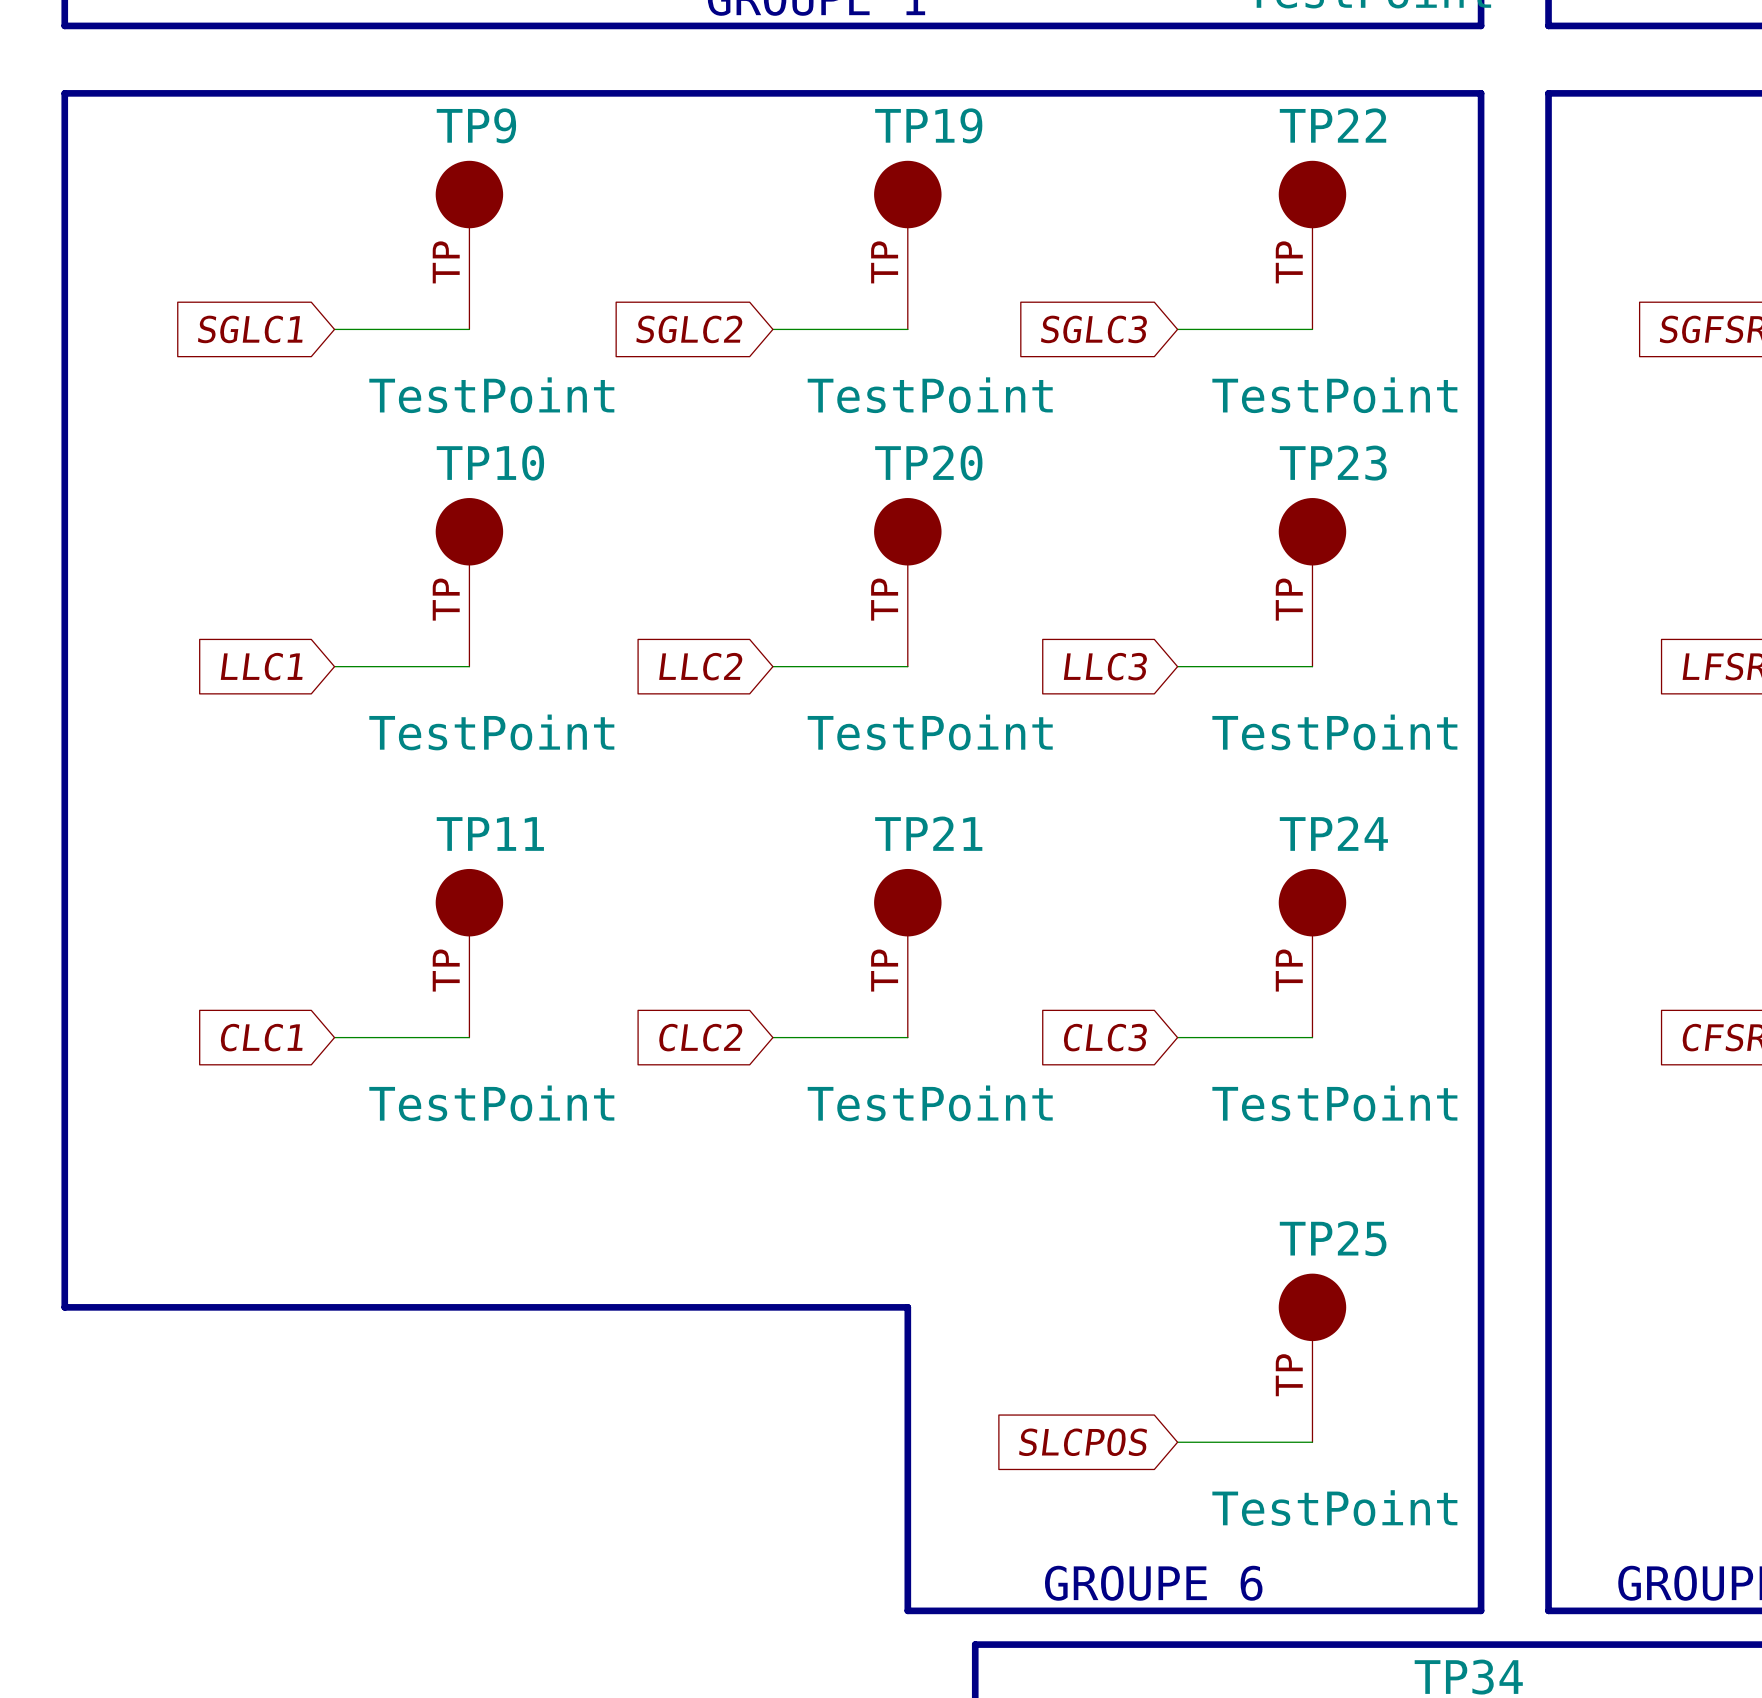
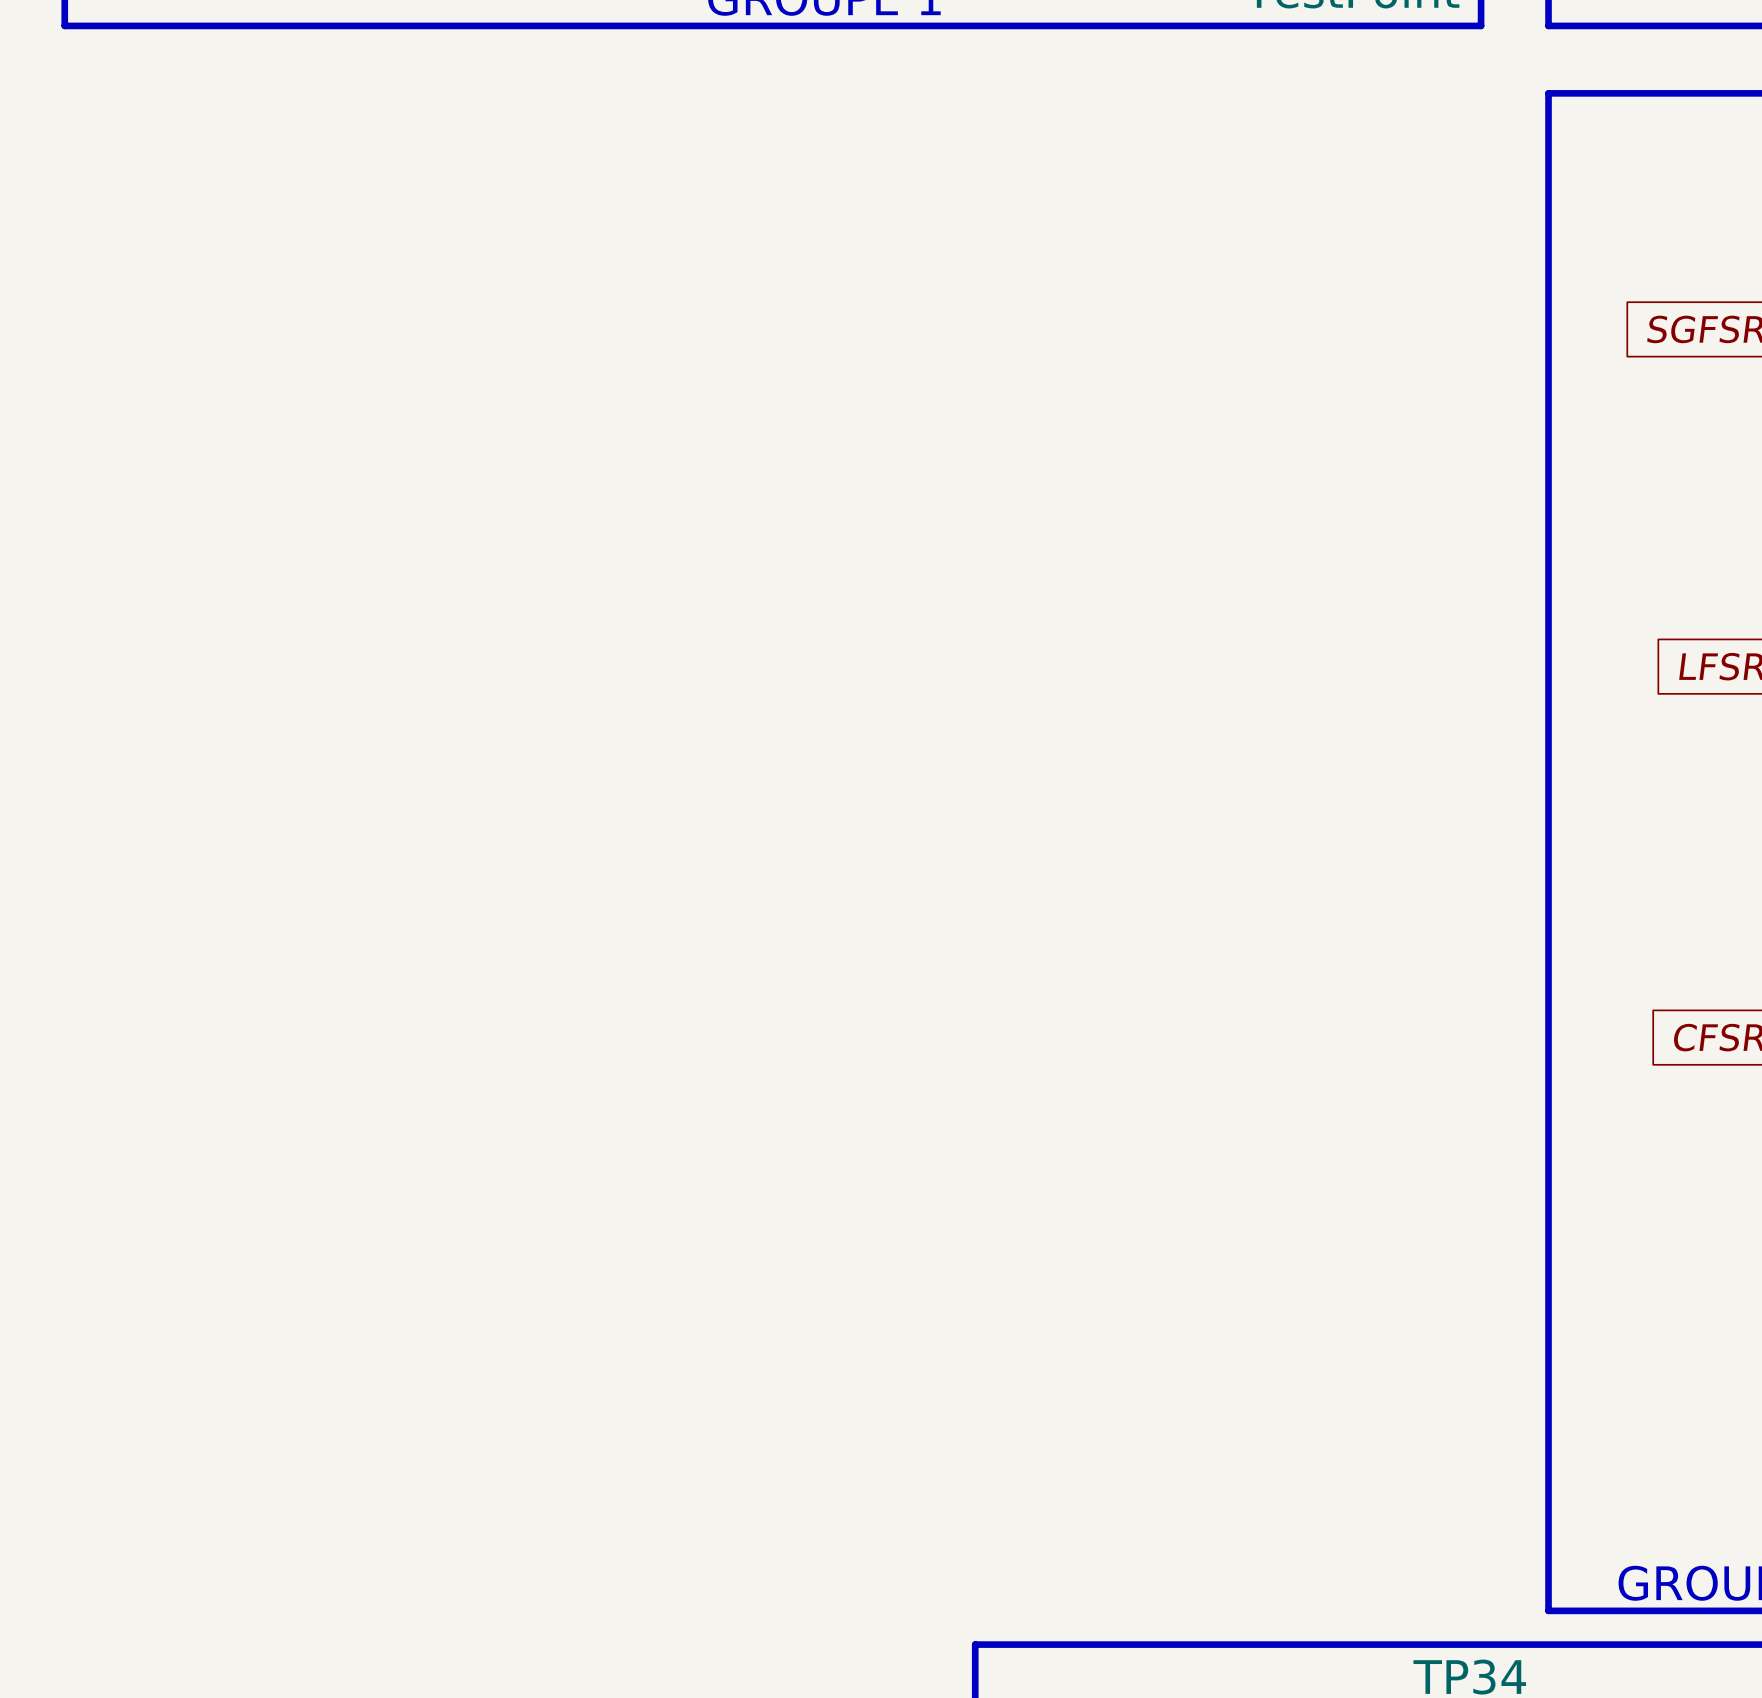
line: (64, 93) (64, 1307) (907, 1307) (907, 1610) (1481, 1610) (1481, 93) (64, 93) -> none
TP9: TestPoint (469, 245) -> none
TP19: TestPoint (907, 245) -> none
TP22: TestPoint (1312, 245) -> none
global label: SGLC1 (250, 329) -> none
wire: (334, 329) (469, 329) -> none
global label: SGLC2 (689, 329) -> none
wire: (772, 329) (907, 329) -> none
global label: SGLC3 (1094, 329) -> none
wire: (1177, 329) (1312, 329) -> none
TP10: TestPoint (469, 582) -> none
TP20: TestPoint (907, 582) -> none
TP23: TestPoint (1312, 582) -> none
global label: LLC1 (261, 666) -> none
wire: (334, 666) (469, 666) -> none
global label: LLC2 (700, 666) -> none
wire: (772, 666) (907, 666) -> none
global label: LLC3 (1105, 666) -> none
wire: (1177, 666) (1312, 666) -> none
TP11: TestPoint (469, 953) -> none
TP21: TestPoint (907, 953) -> none
TP24: TestPoint (1312, 953) -> none
global label: CLC1 (261, 1037) -> none
wire: (334, 1037) (469, 1037) -> none
global label: CLC2 (700, 1037) -> none
wire: (772, 1037) (907, 1037) -> none
global label: CLC3 (1105, 1037) -> none
wire: (1177, 1037) (1312, 1037) -> none
TP25: TestPoint (1312, 1357) -> none
global label: SLCPOS (1083, 1442) -> none
wire: (1177, 1442) (1312, 1442) -> none
text: GROUPE 6 (1153, 1583) -> none

